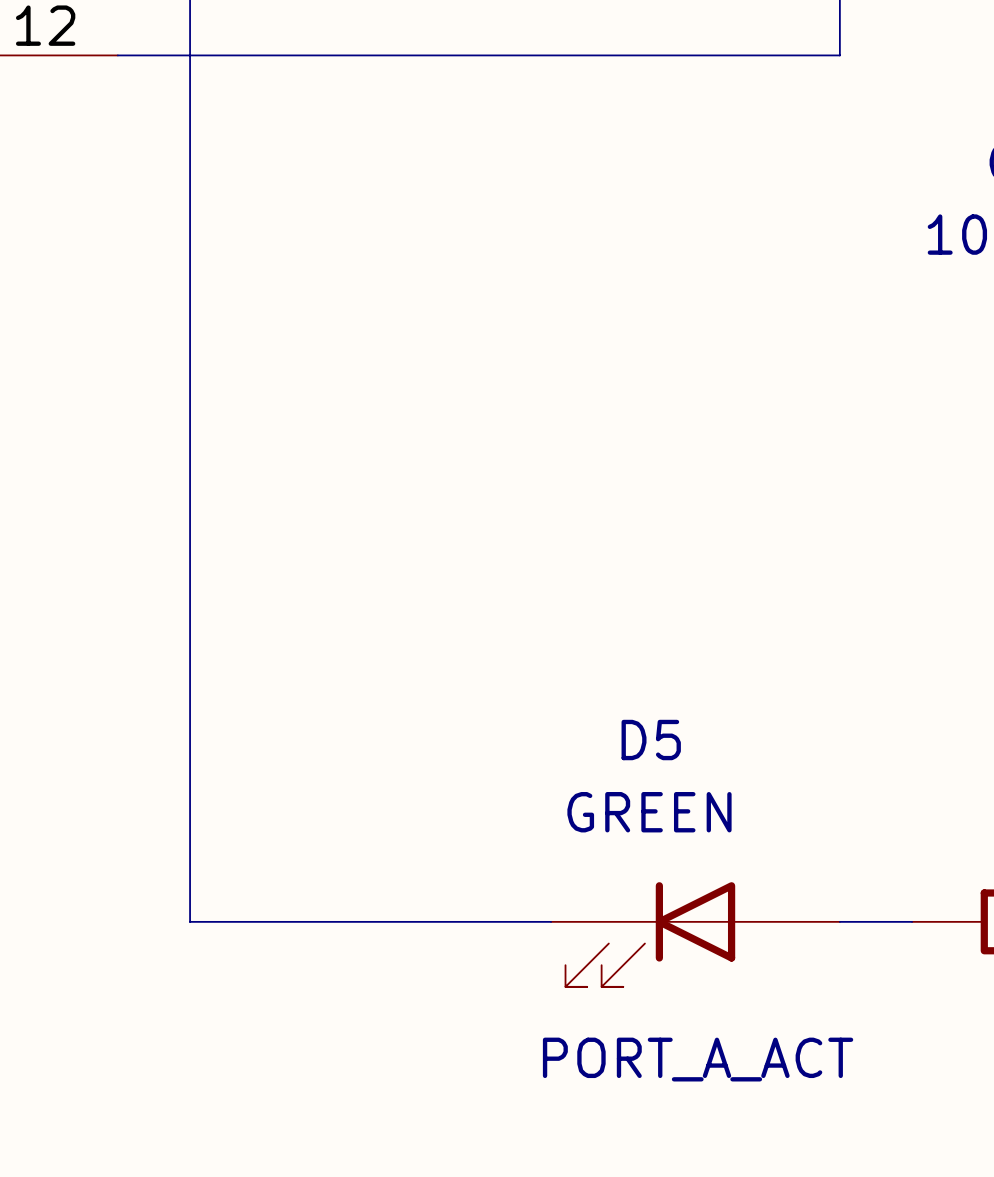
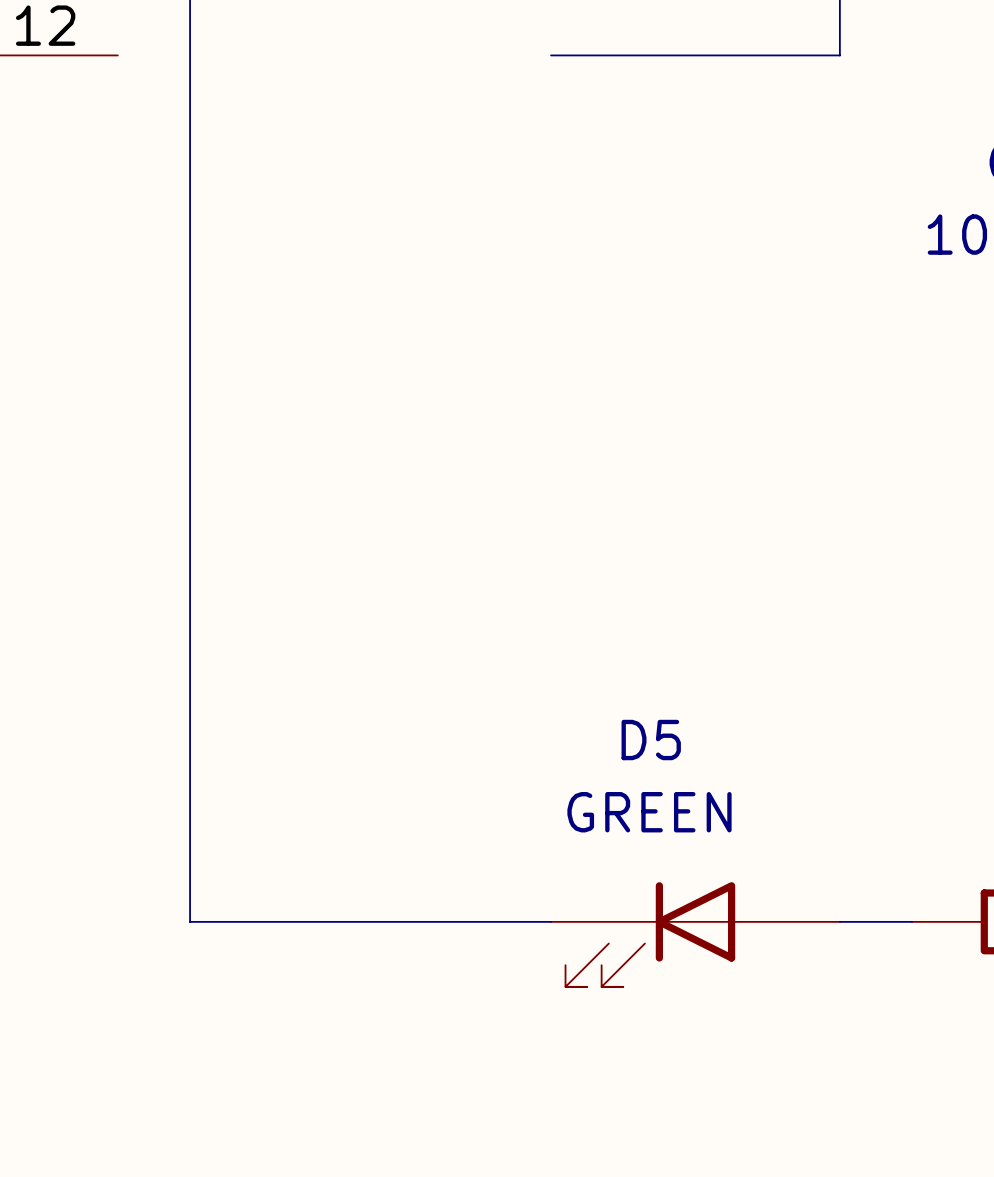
wire: (117, 55) (551, 55) -> none
text: PORT_A_ACT (698, 1059) -> none

